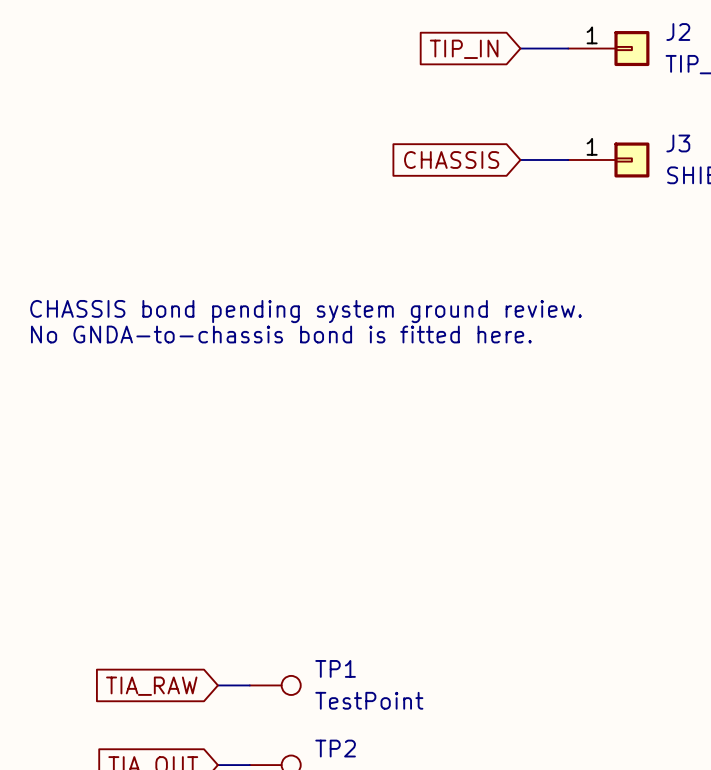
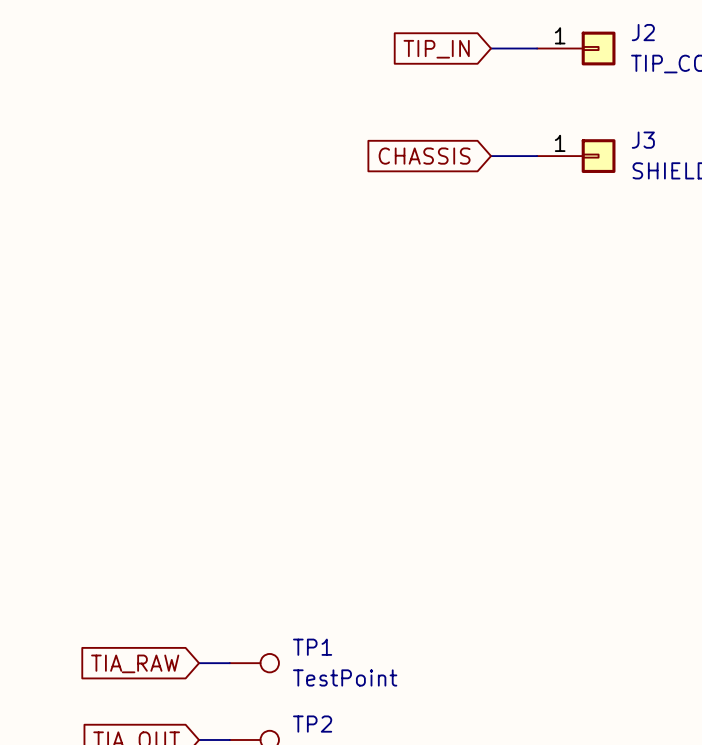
text: CHASSIS bond pending system ground review. (306, 311) -> none
text: No GNDA-to-chassis bond is fitted here. (281, 334) -> none

